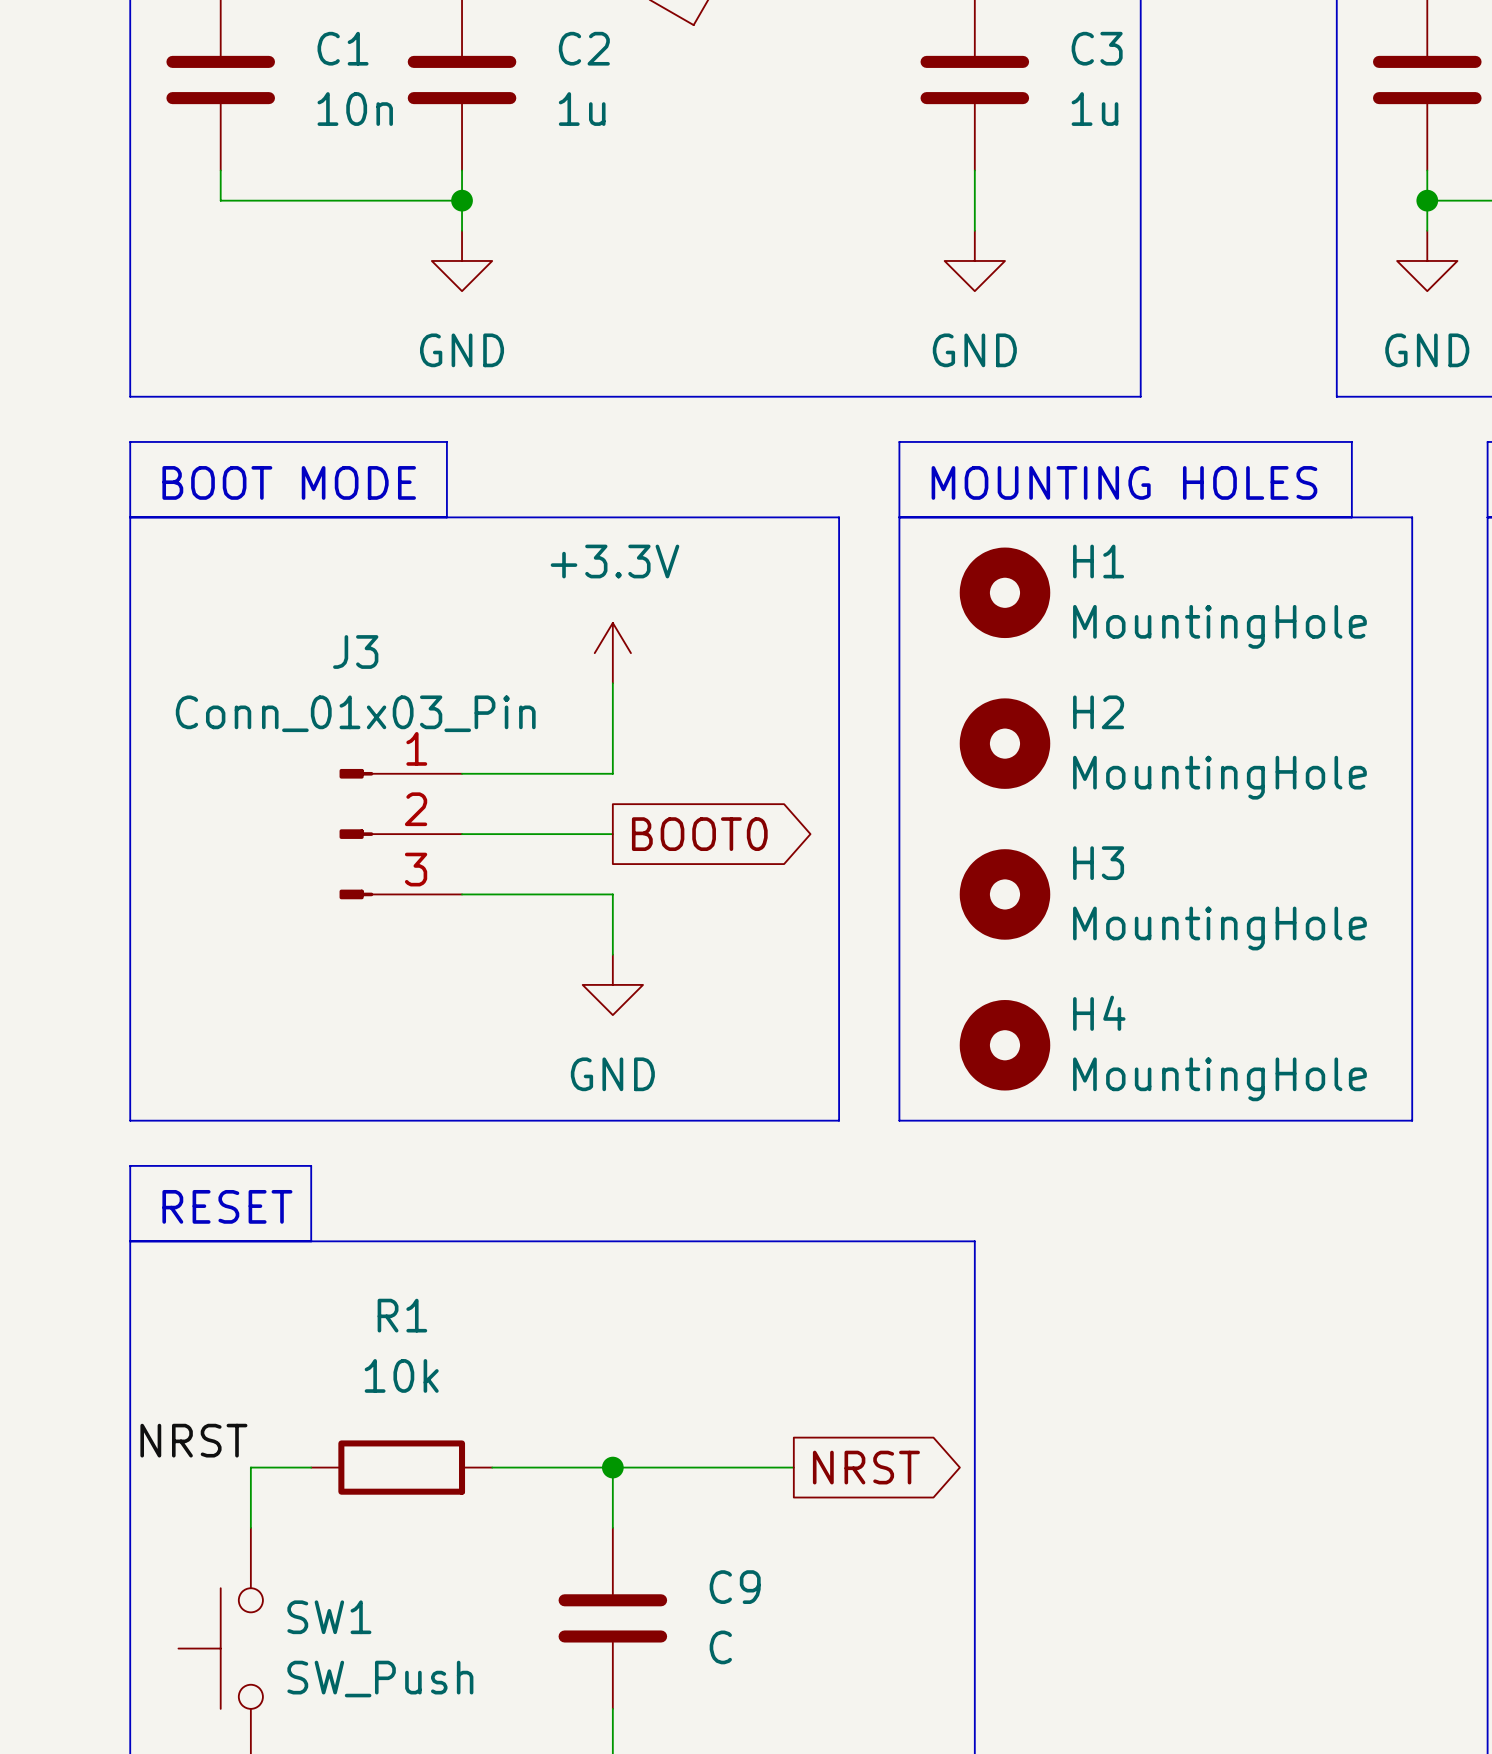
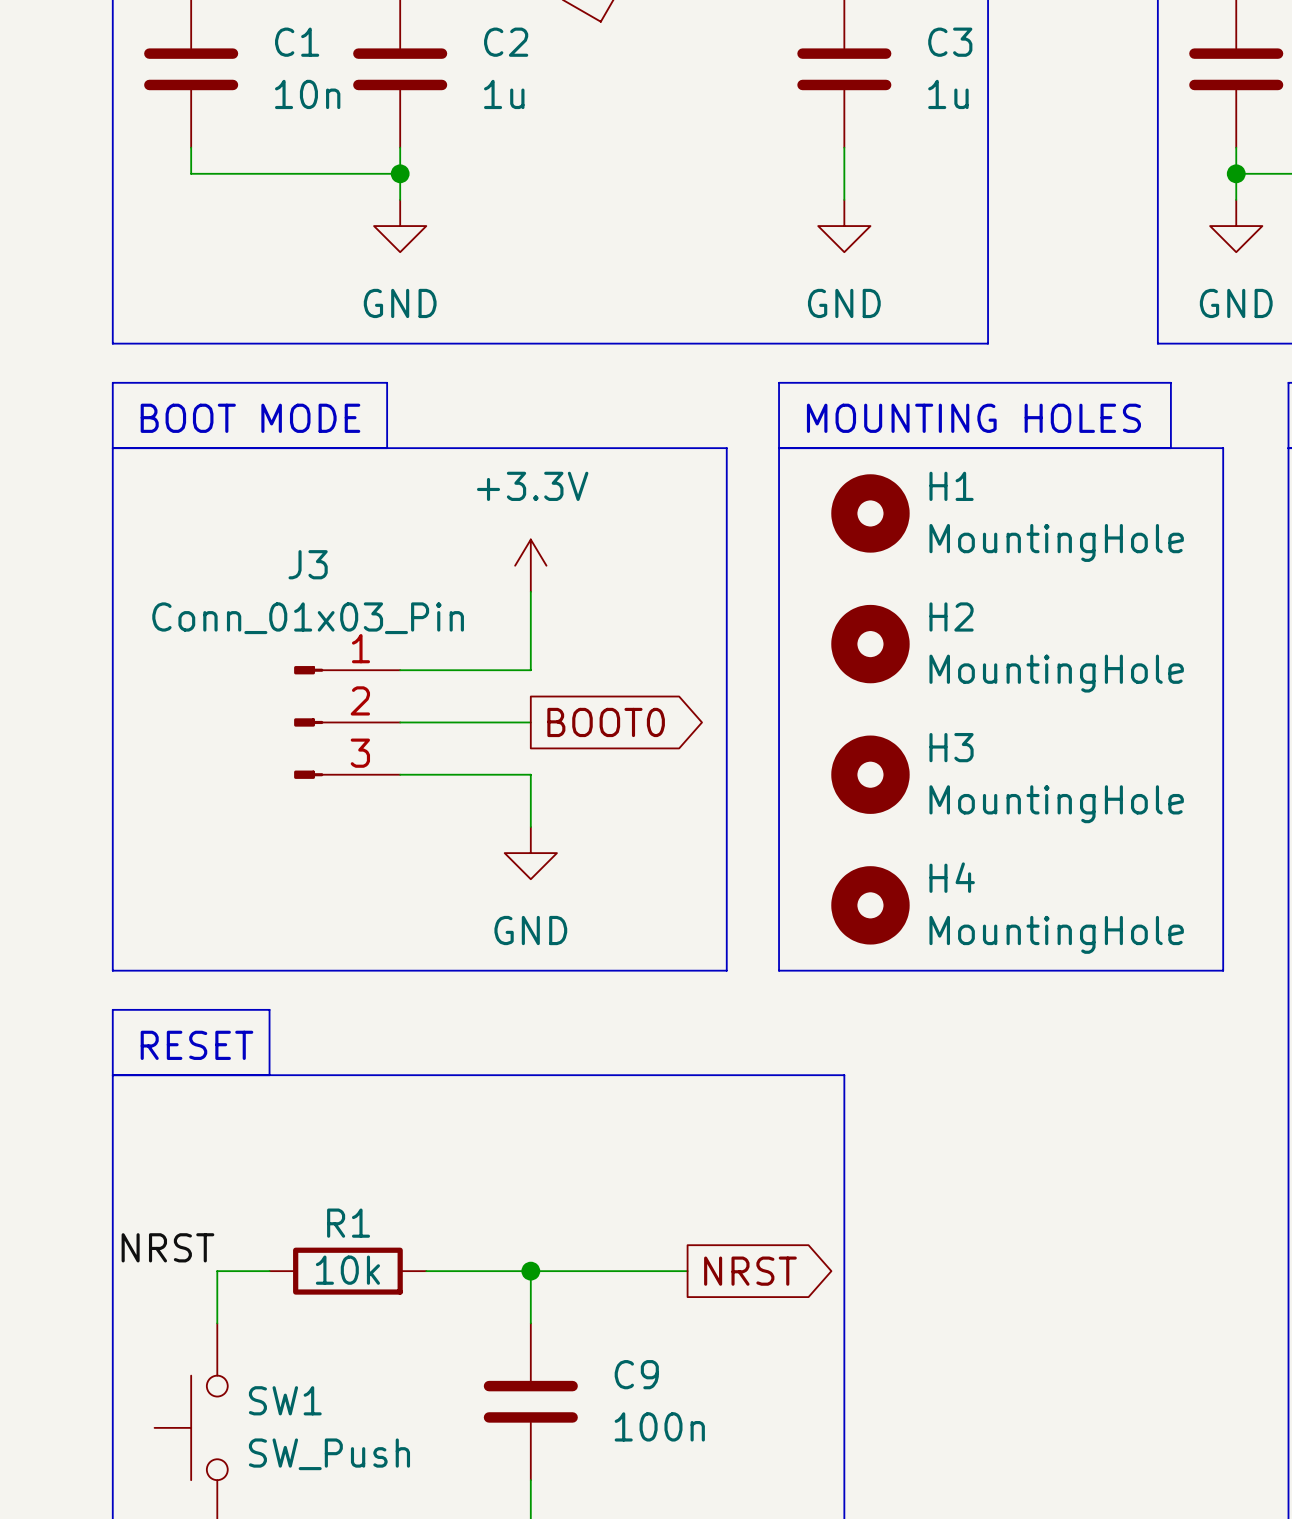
R1 name position: R1 (402, 1315) -> R1 (348, 1223)
R1 value position: 10k (401, 1375) -> 10k (347, 1270)
C9 value: C (720, 1647) -> 100n (659, 1426)

